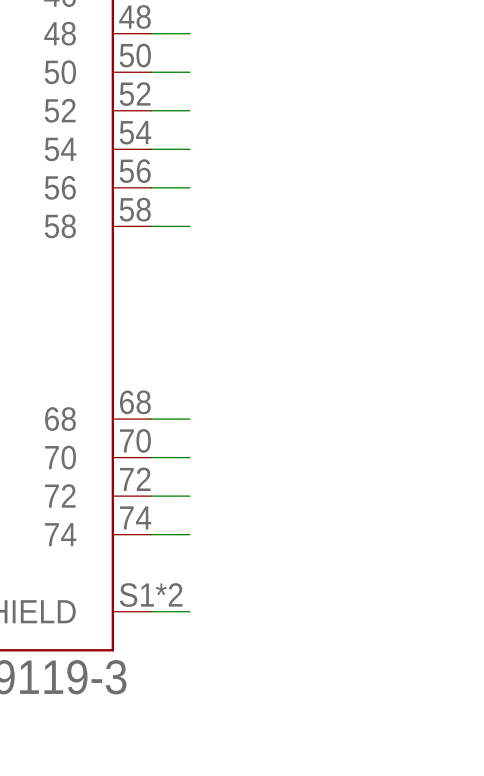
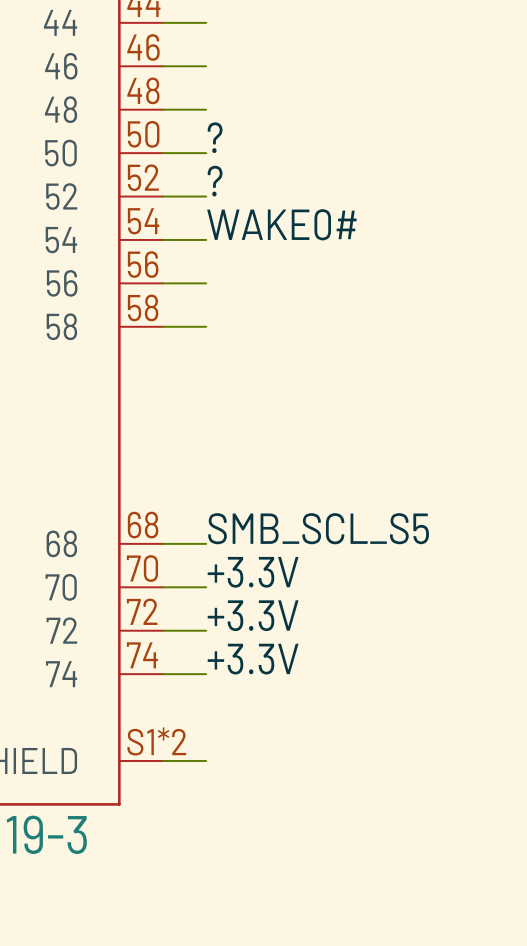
label: none -> ? (215, 137)
label: none -> ? (215, 181)
label: none -> WAKE0# (281, 224)
label: none -> SMB_SCL_S5 (318, 528)
label: none -> +3.3V (253, 572)
label: none -> +3.3V (253, 615)
label: none -> +3.3V (253, 659)

